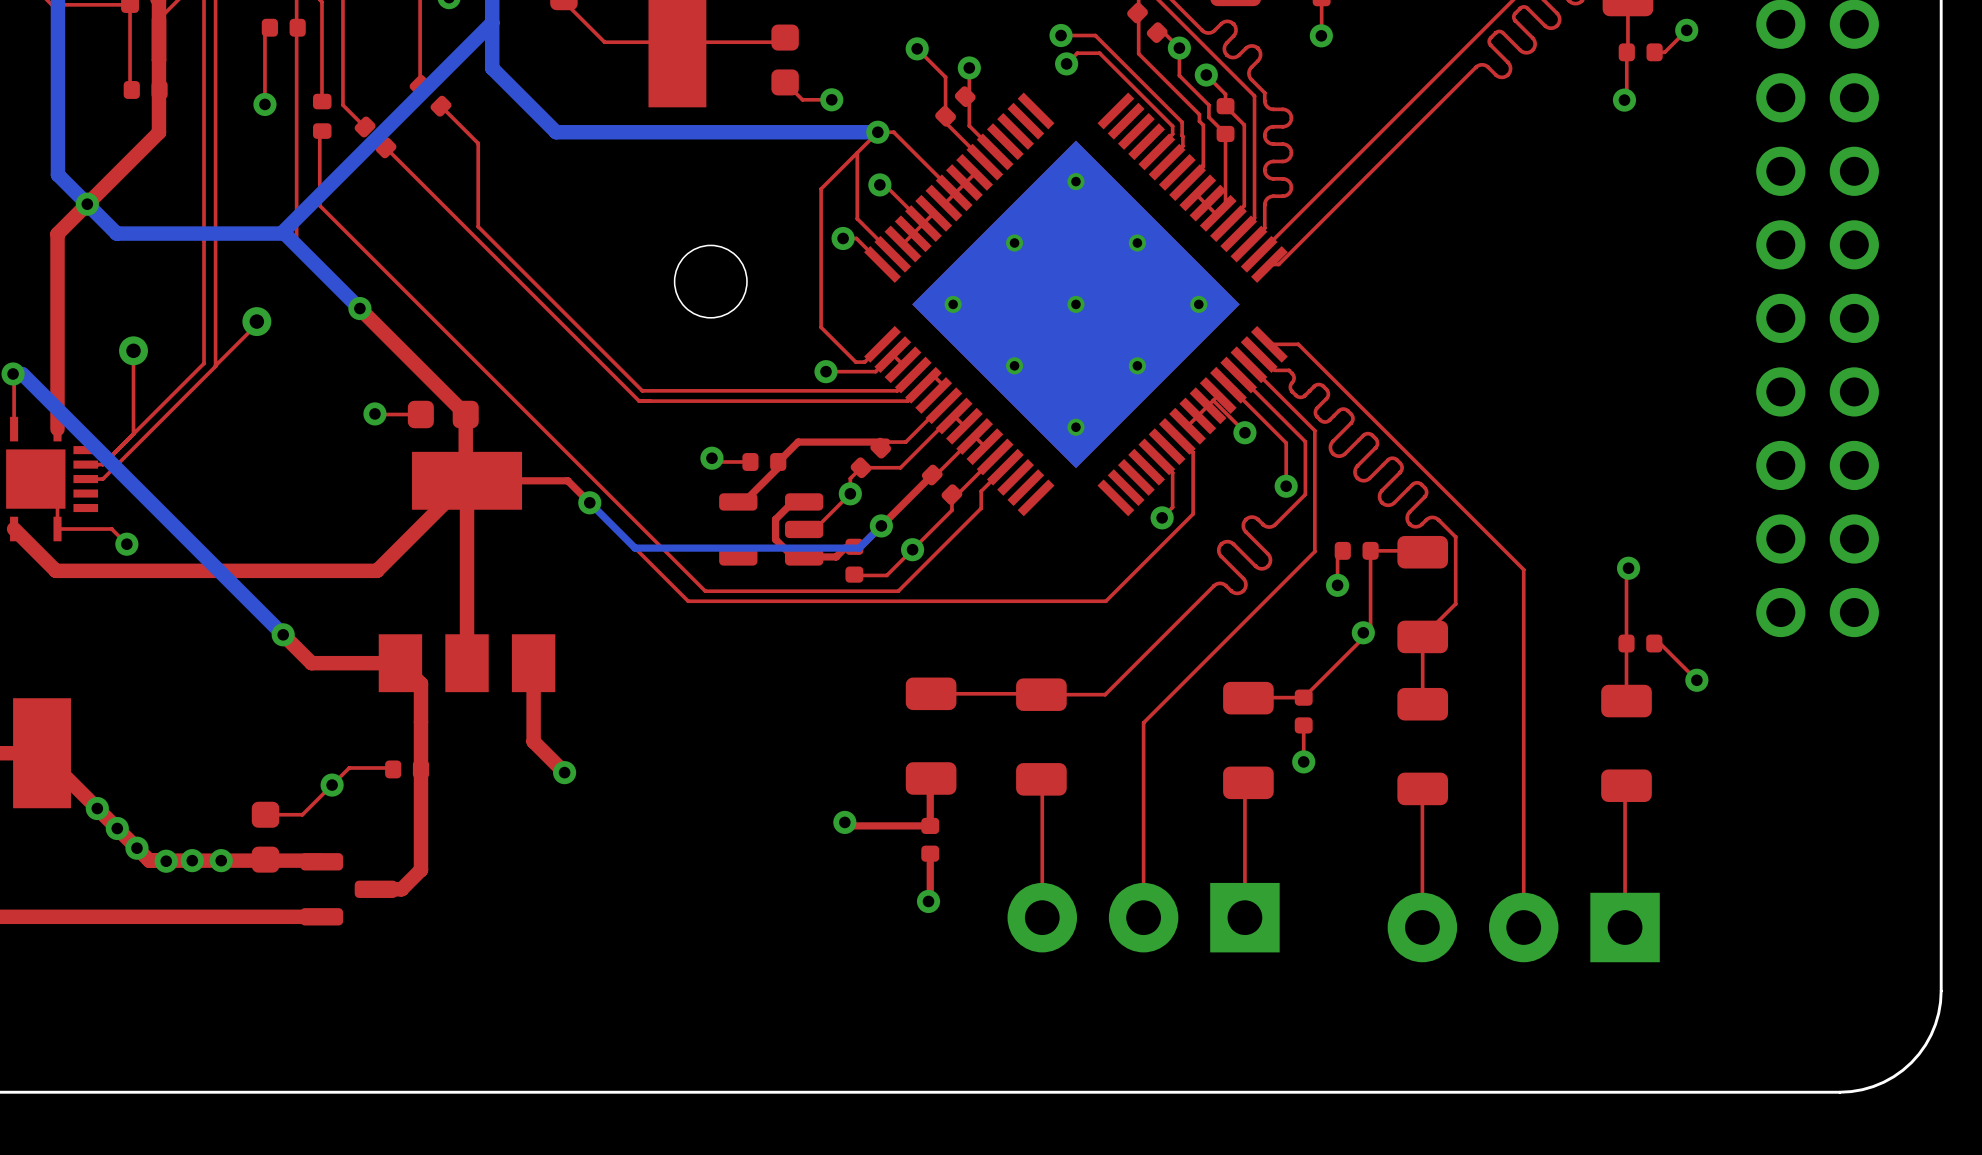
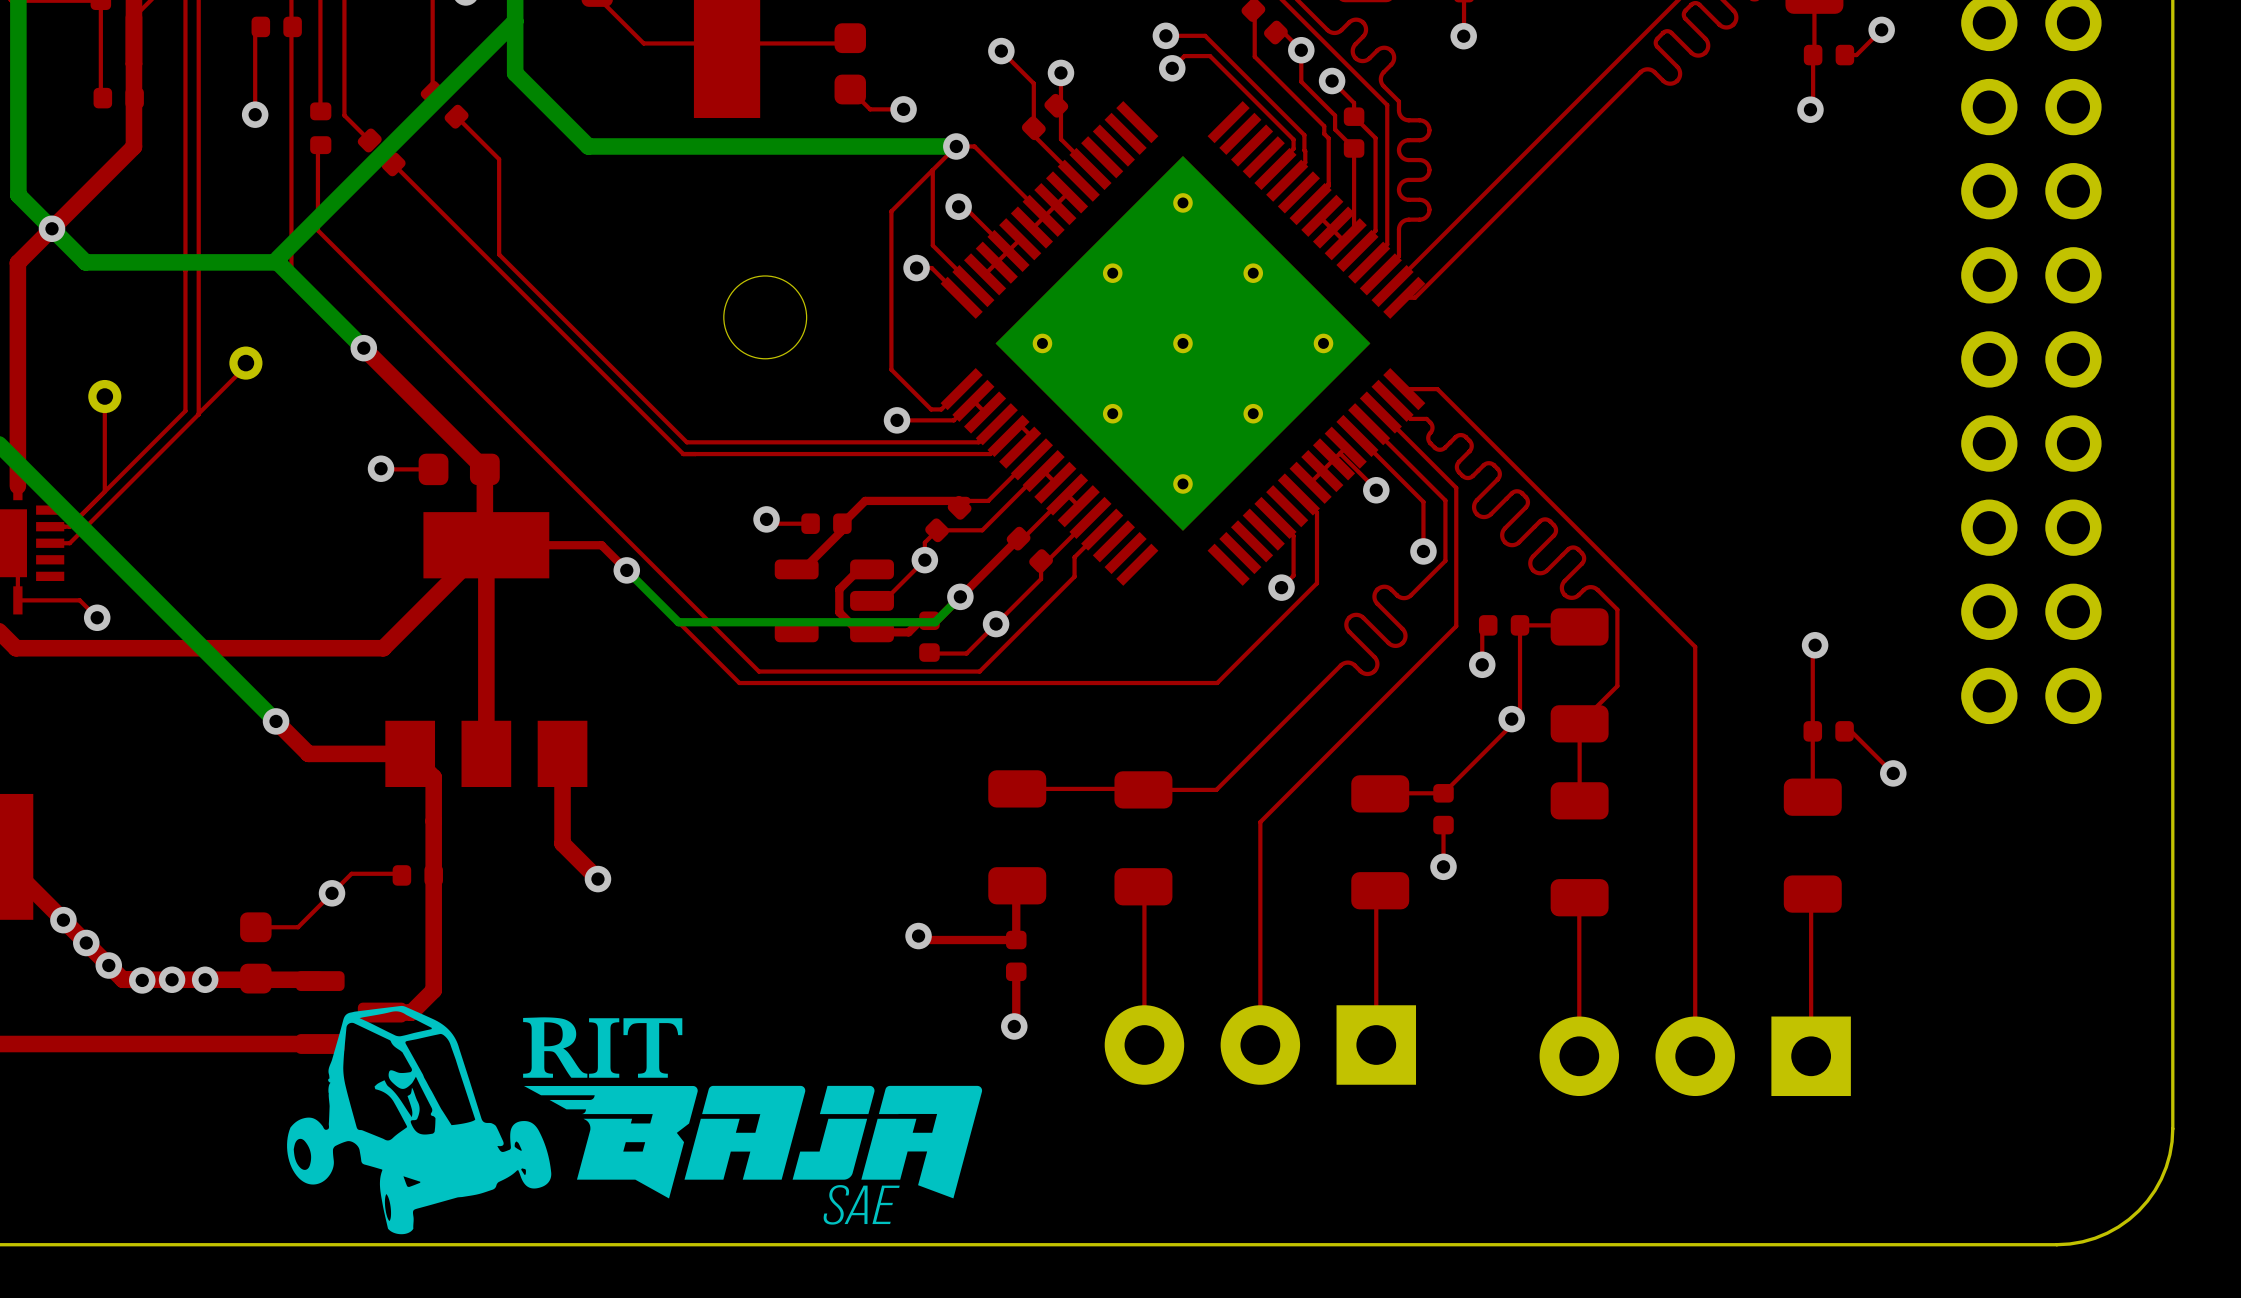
drawing: none -> [287, 1005, 983, 1235]

